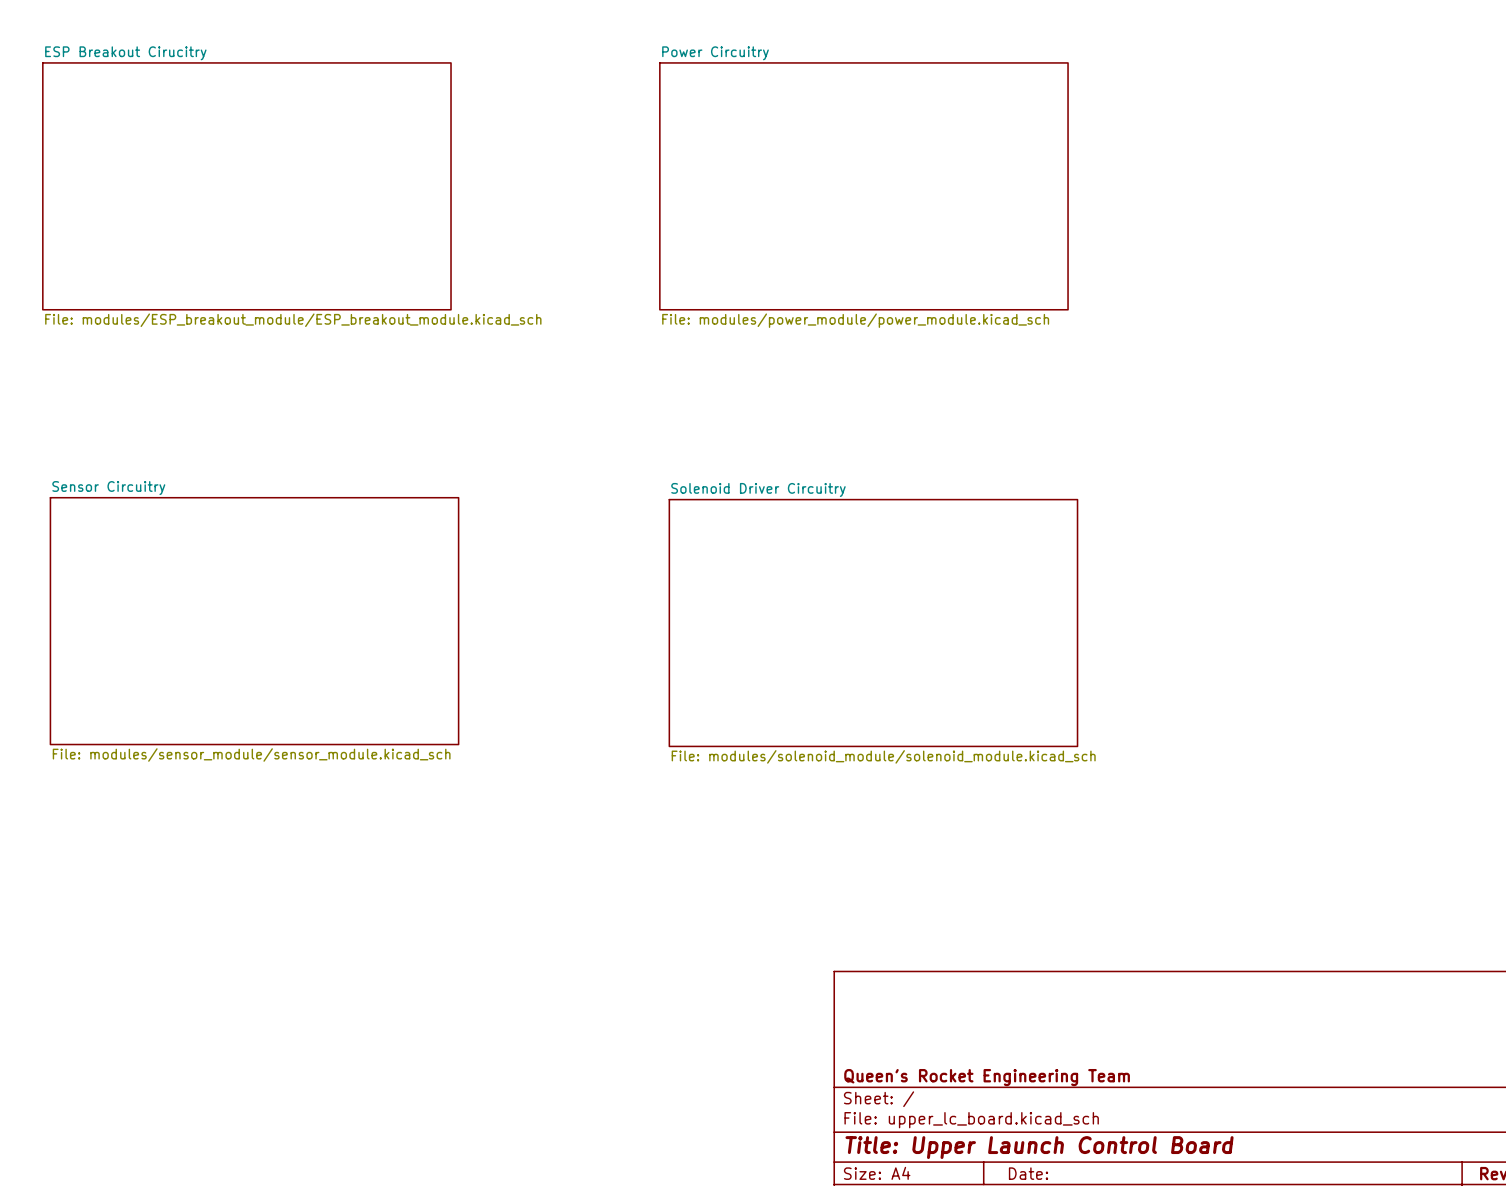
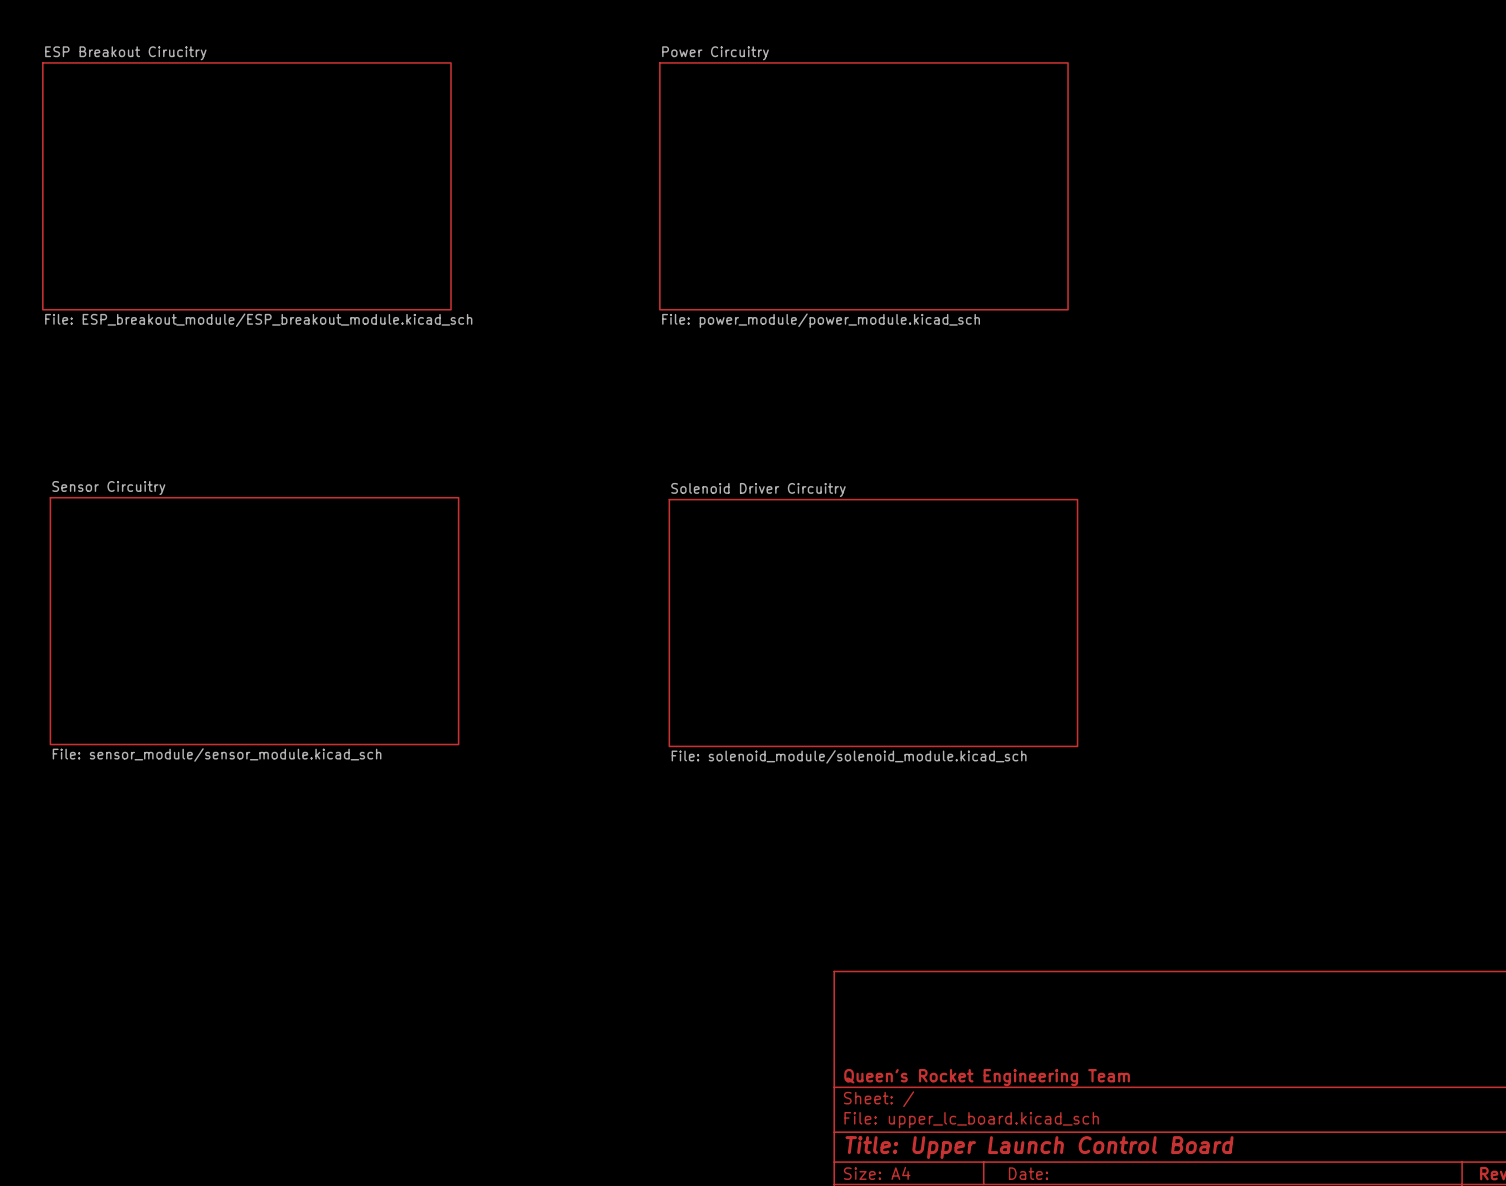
sheet ESP Breakout Cirucitry value: File: modules/ESP_breakout_module/ESP_breakout_module.kicad_sch (293, 320) -> File: ESP_breakout_module/ESP_breakout_module.kicad_sch (258, 320)
sheet Power Circuitry value: File: modules/power_module/power_module.kicad_sch (855, 320) -> File: power_module/power_module.kicad_sch (821, 320)
sheet Sensor Circuitry value: File: modules/sensor_module/sensor_module.kicad_sch (251, 755) -> File: sensor_module/sensor_module.kicad_sch (217, 755)
sheet Solenoid Driver Circuitry value: File: modules/solenoid_module/solenoid_module.kicad_sch (883, 756) -> File: solenoid_module/solenoid_module.kicad_sch (849, 756)

